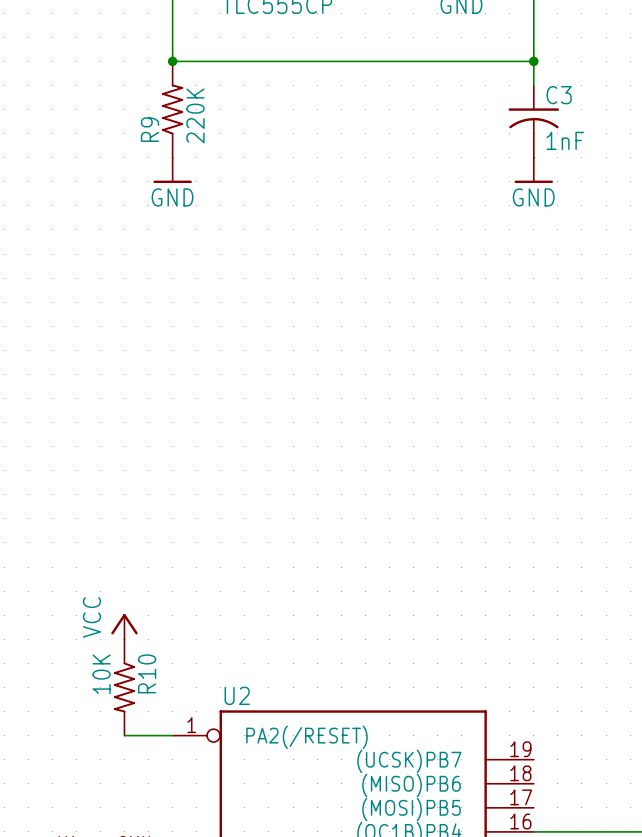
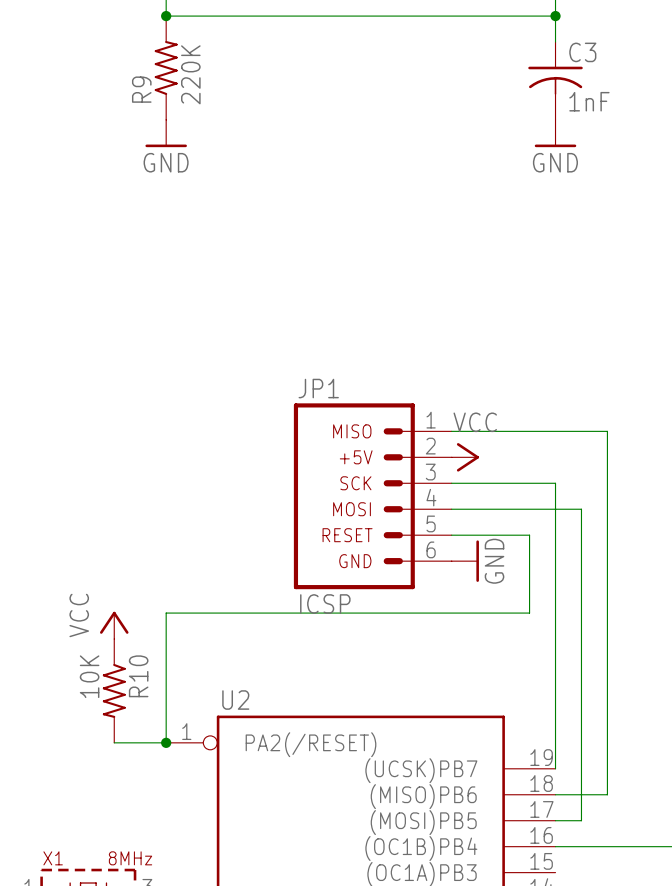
wire: none -> (451, 431) (607, 431) (607, 794) (555, 794)
power symbol: none -> VCC (465, 457)
wire: none -> (451, 483) (555, 483) (555, 768)
JP1: none -> (372, 496)
wire: none -> (451, 509) (581, 509) (581, 820) (555, 820)
wire: none -> (451, 535) (529, 535) (529, 613) (166, 613) (166, 742)
power symbol: none -> GND (465, 561)
junction: none -> (166, 742)

